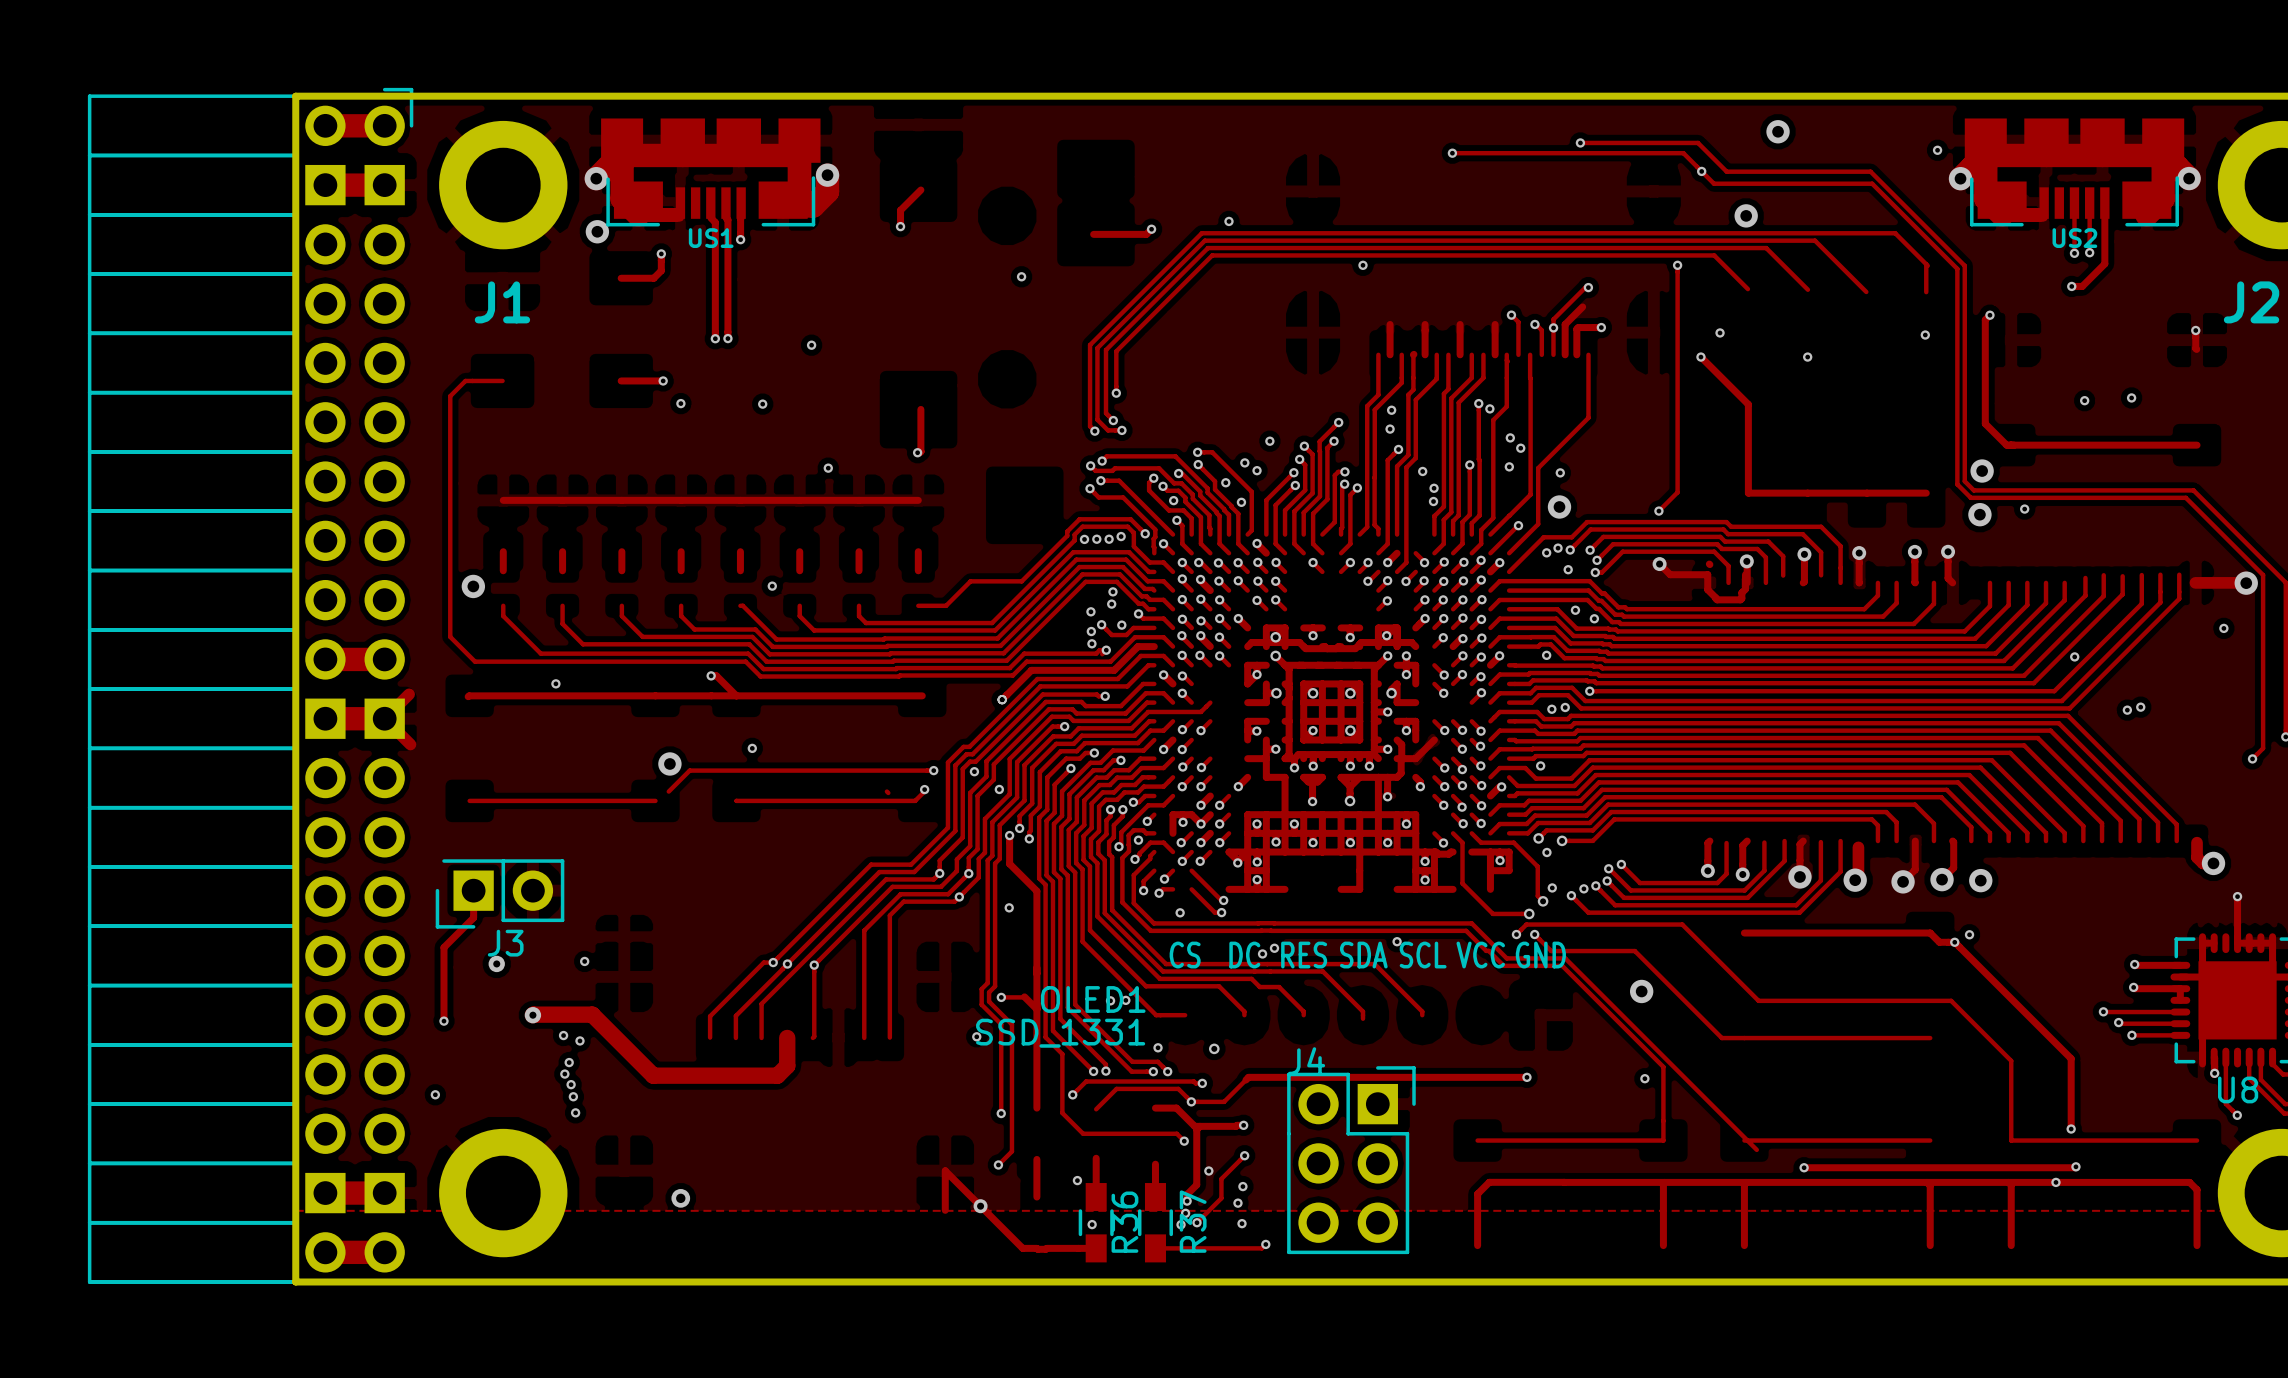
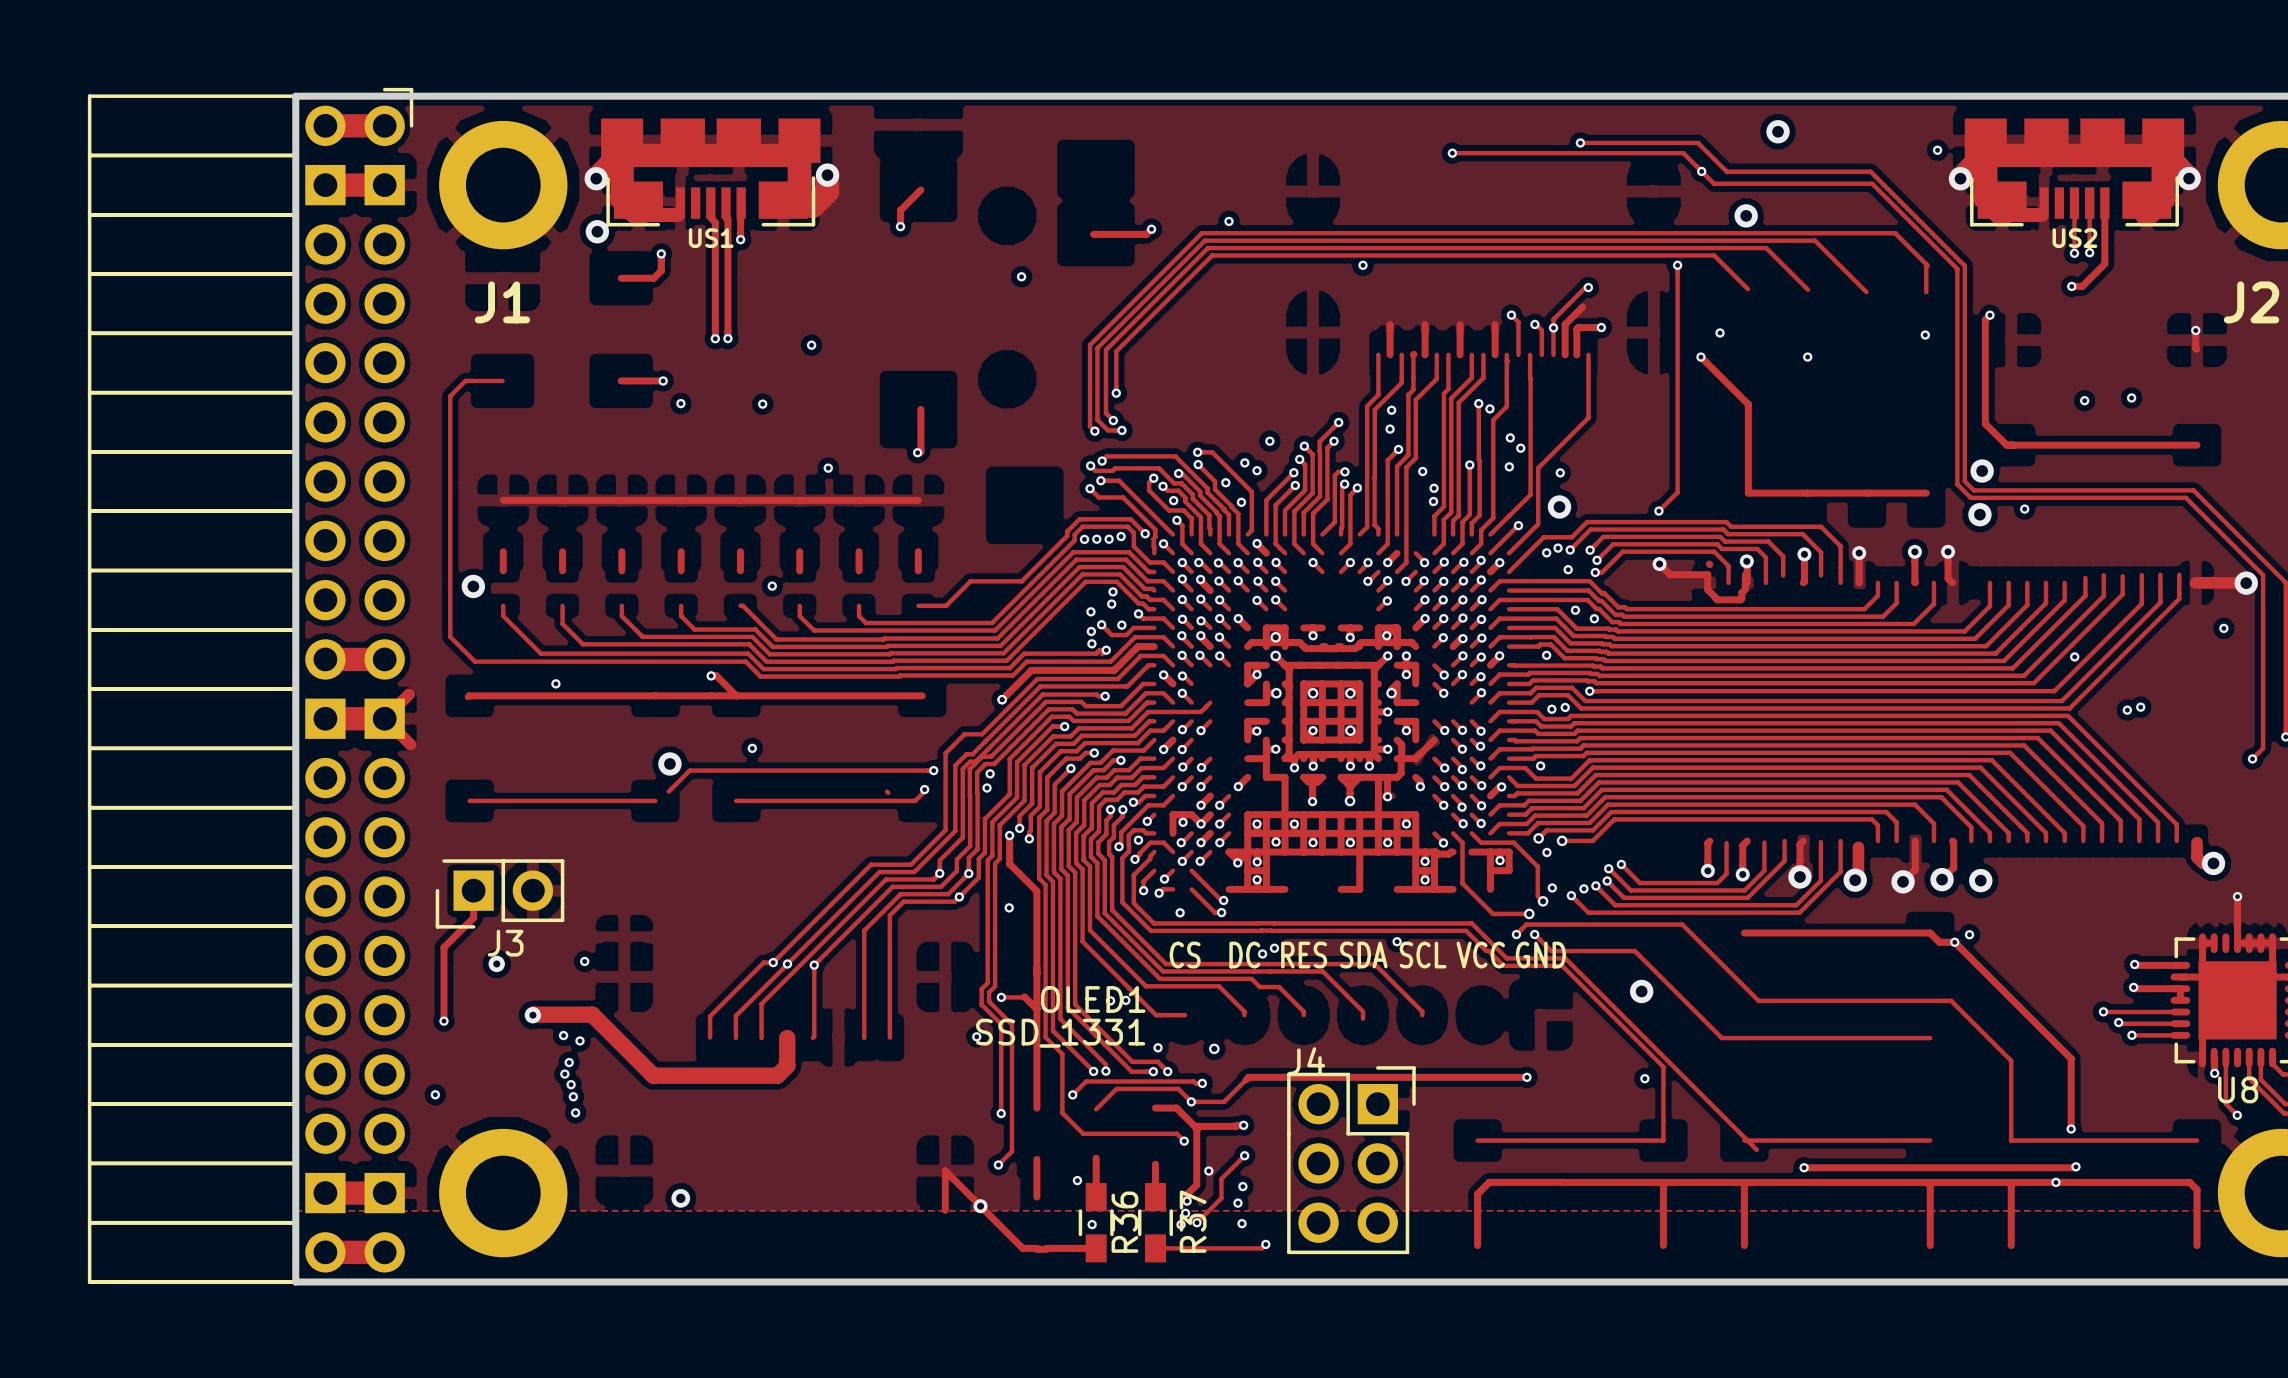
track: (982, 734) (969, 746) (963, 746) (947, 762) (947, 827) (945, 830) -> (982, 734) (964, 734) (945, 753) (945, 830)
track: (991, 756) (986, 761) (986, 776) (970, 792) (970, 796) -> (991, 756) (982, 756) (969, 769) (970, 796)
track: (994, 764) (993, 779) (977, 795) -> (994, 764) (985, 764) (977, 772) (977, 795)
via: (974, 771) -> none
via: none -> (990, 773)
via: none -> (987, 788)
via: (999, 789) -> none

